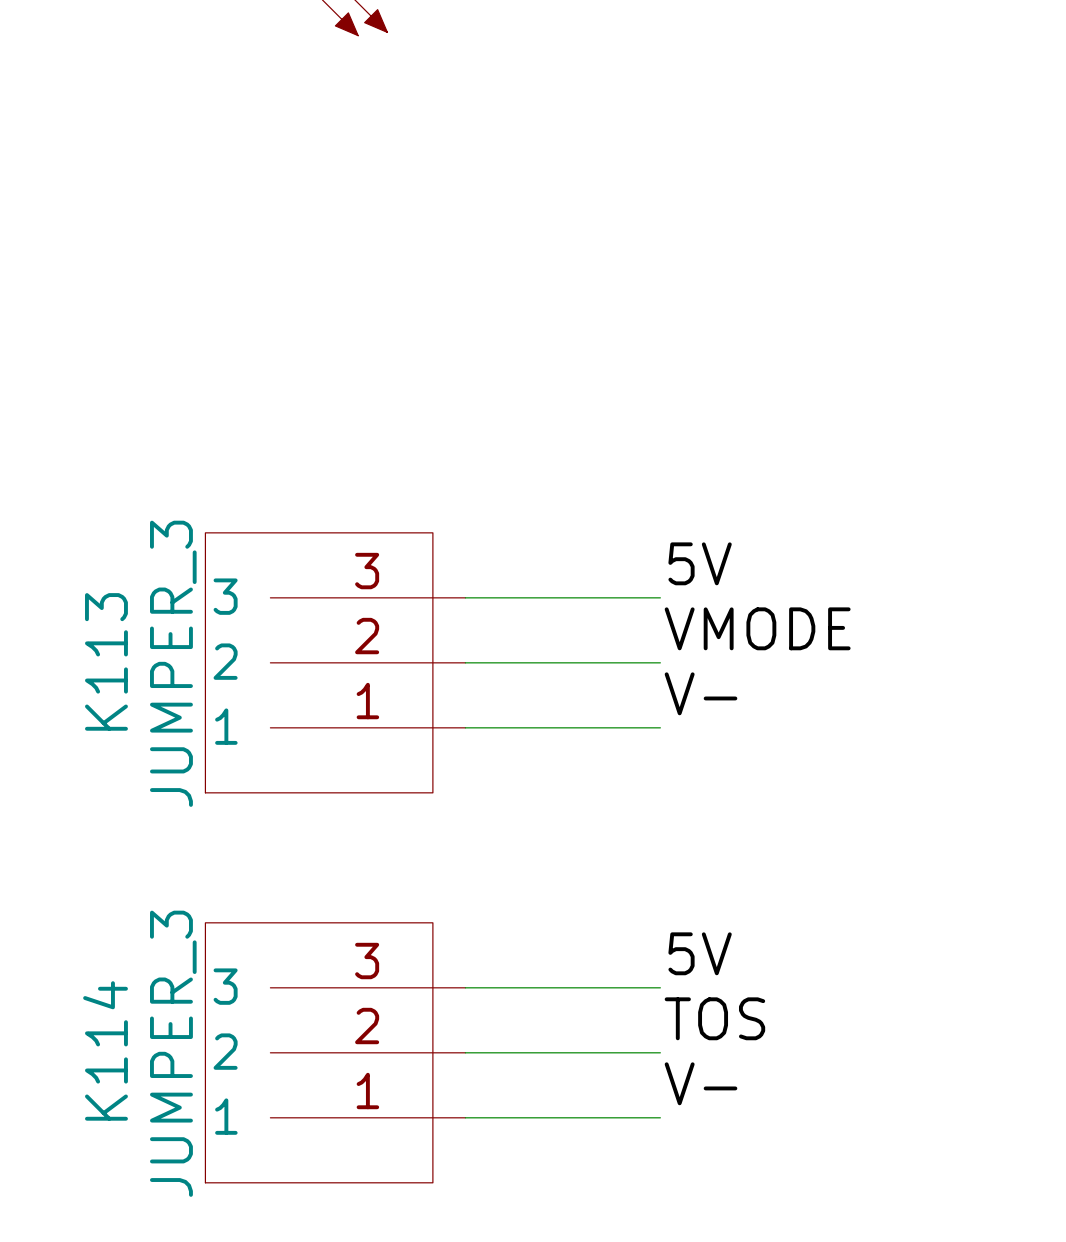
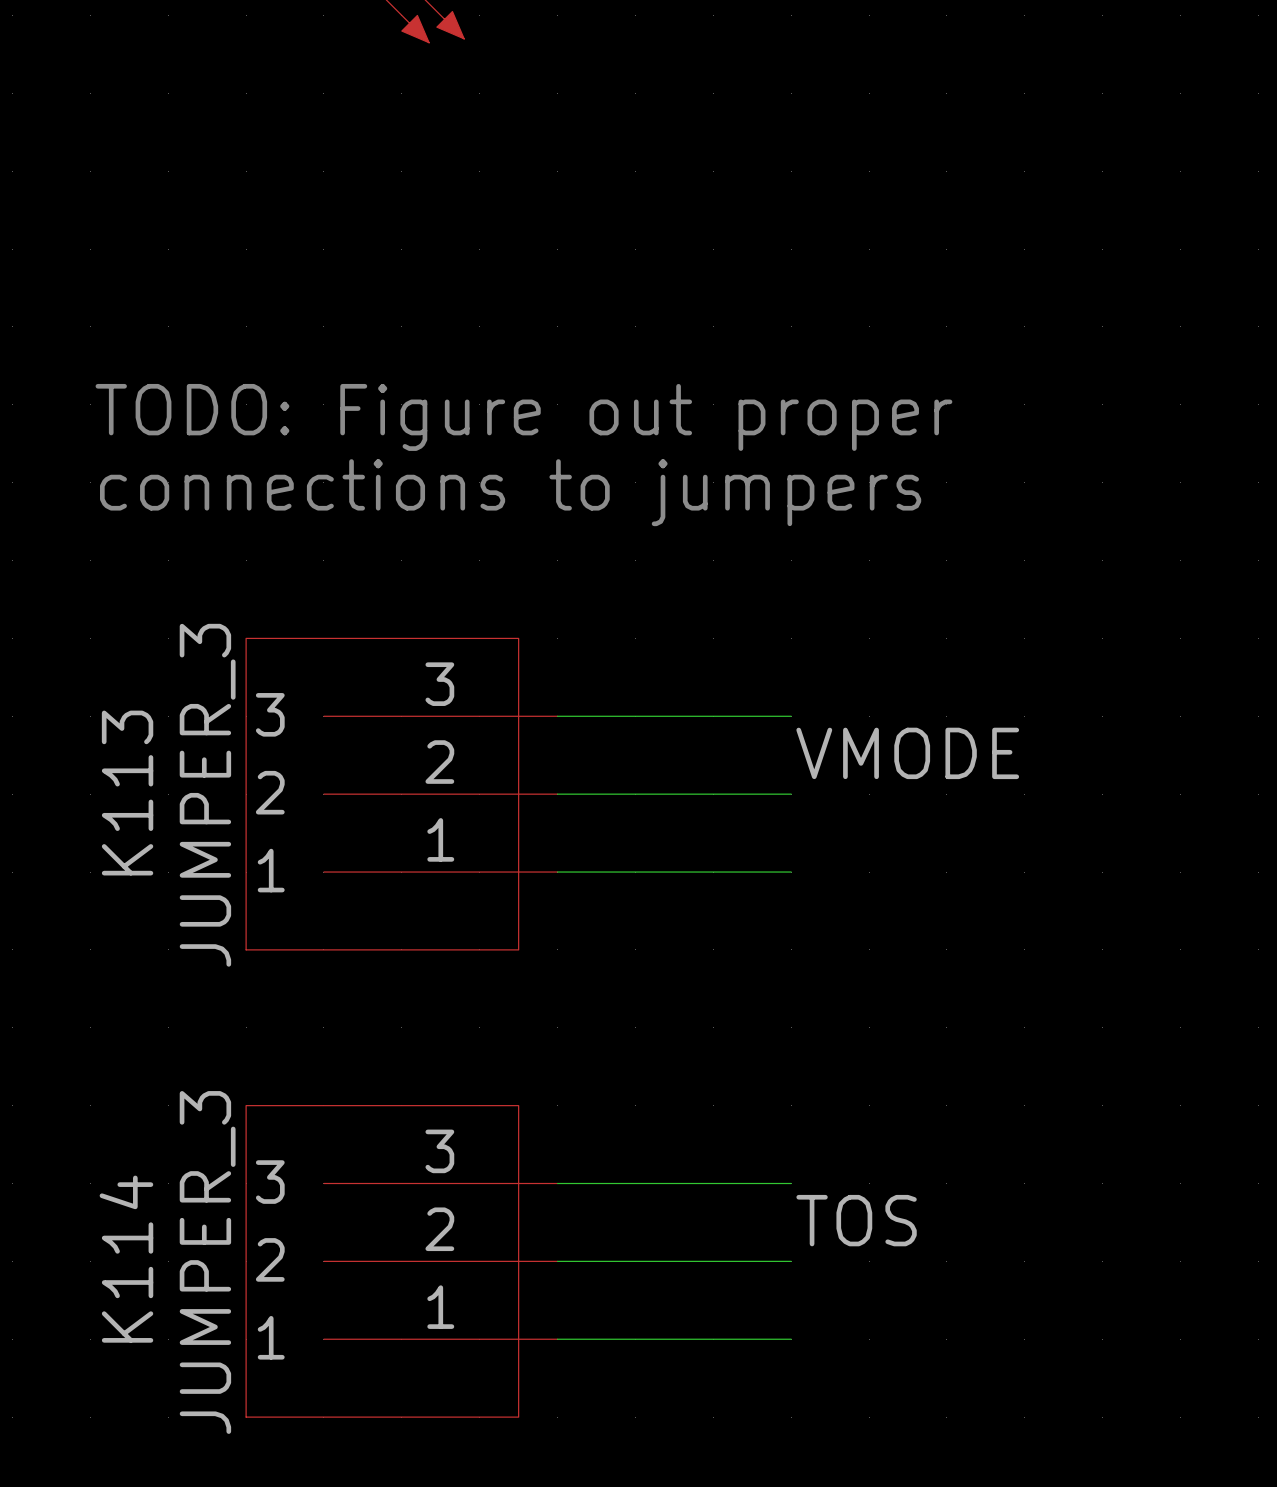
text: none -> TODO: Figure out proper (523, 417)
text: none -> connections to jumpers (510, 492)
label: 5V (700, 563) -> none
label: V- (701, 693) -> none
label: 5V (700, 953) -> none
label: V- (701, 1083) -> none

